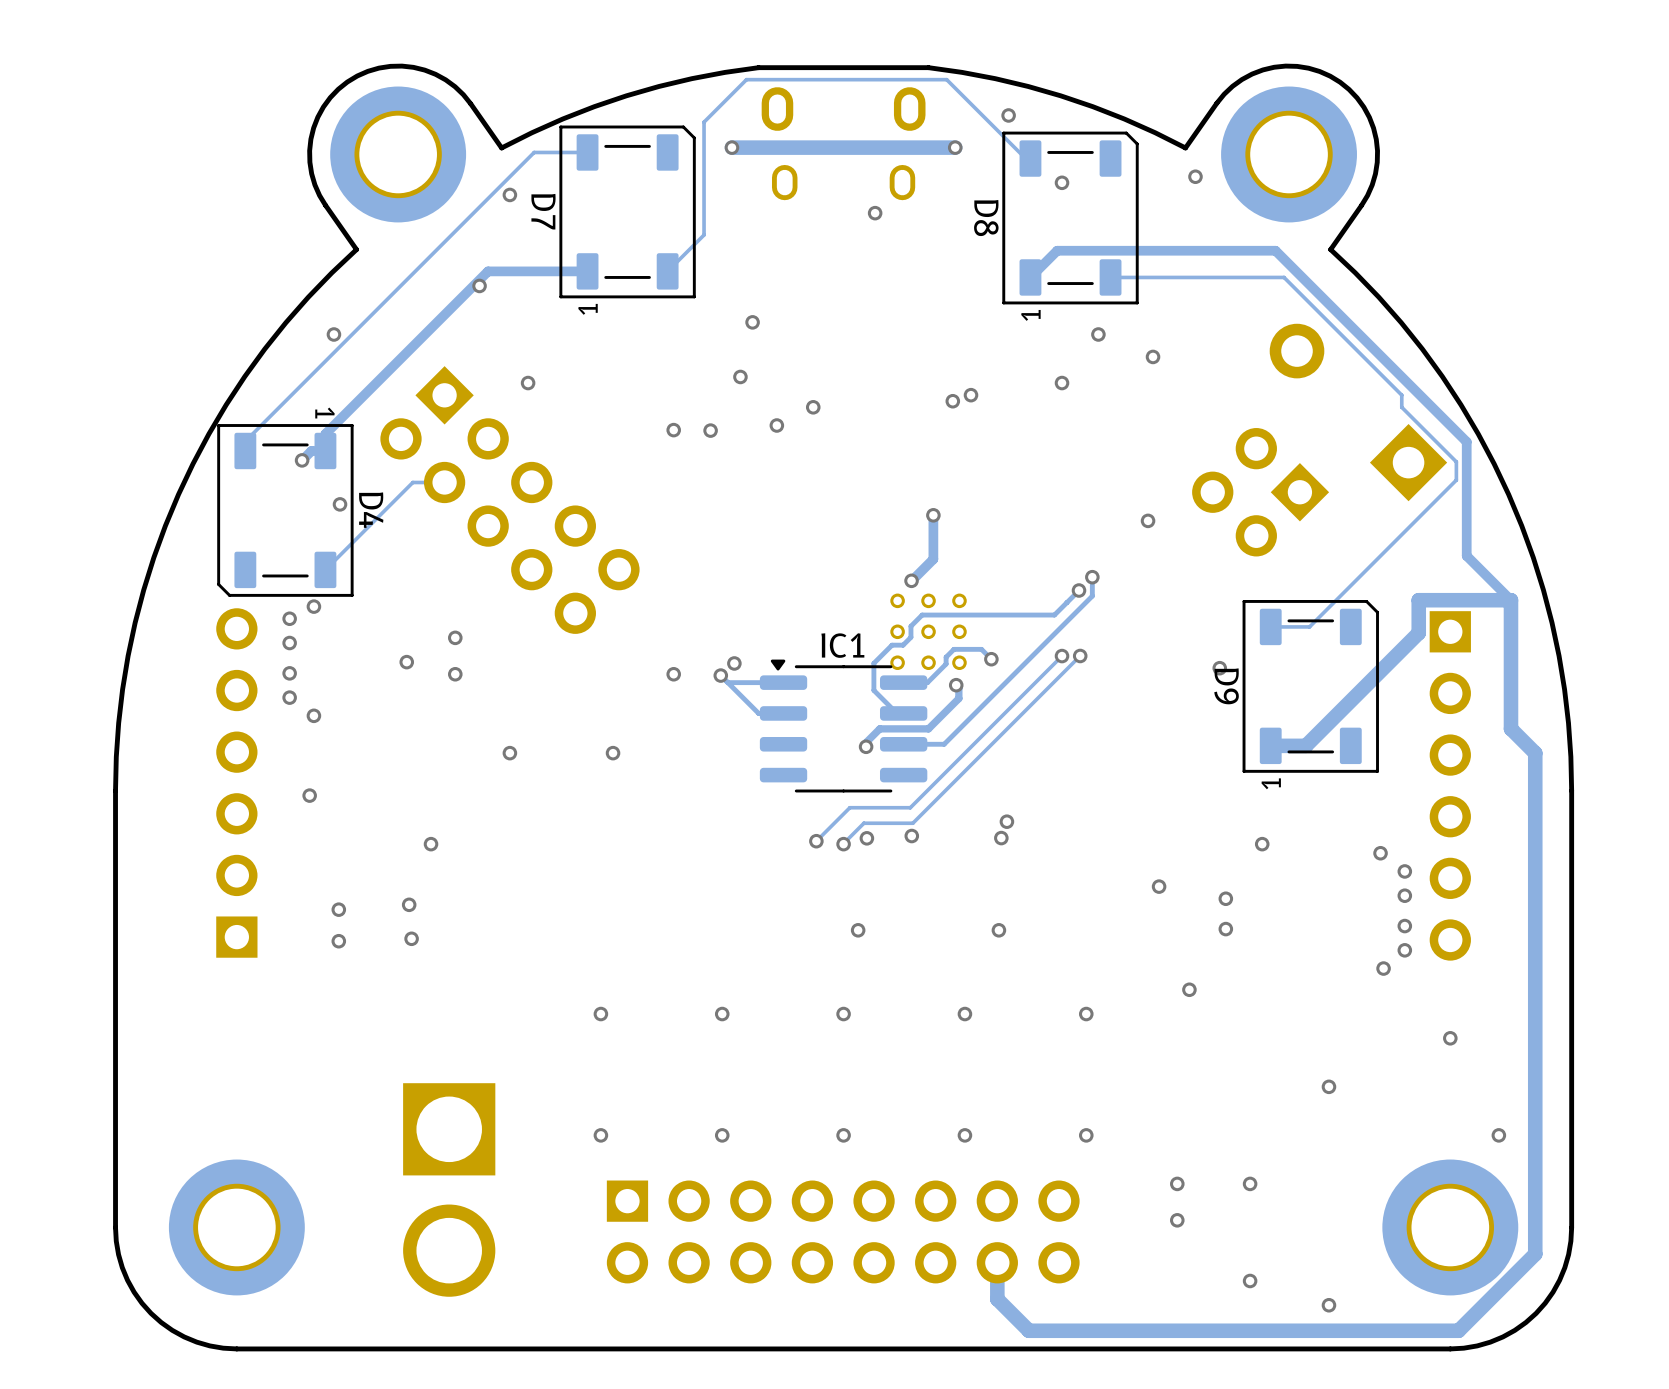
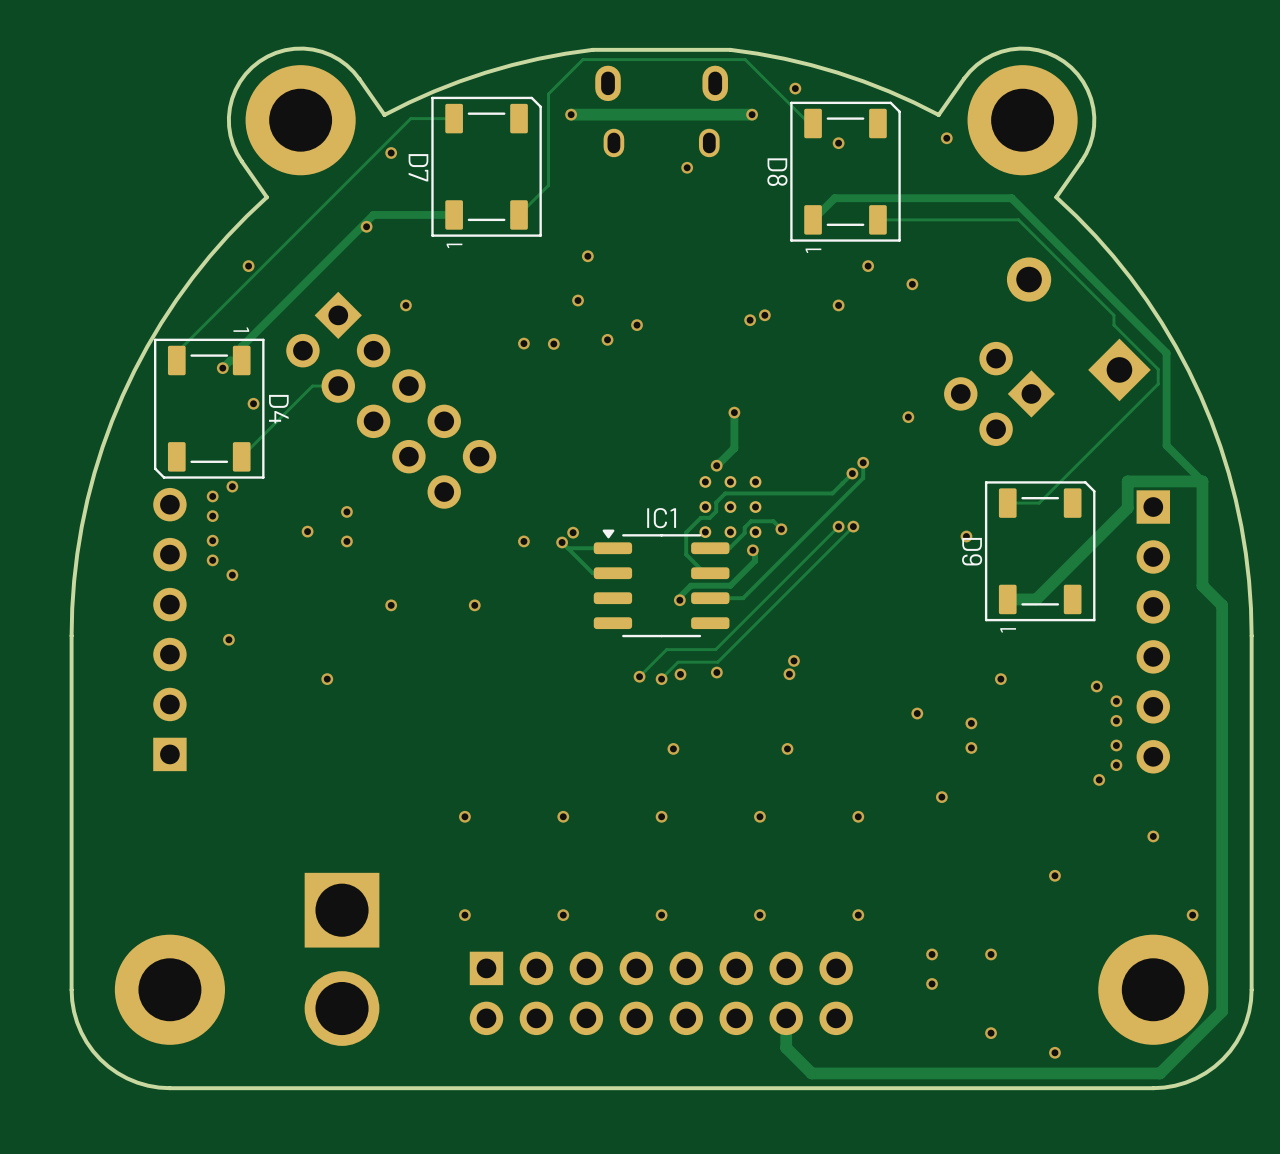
via: (409, 904) -> none
via: (338, 909) -> none
via: (411, 938) -> none
via: (338, 941) -> none

